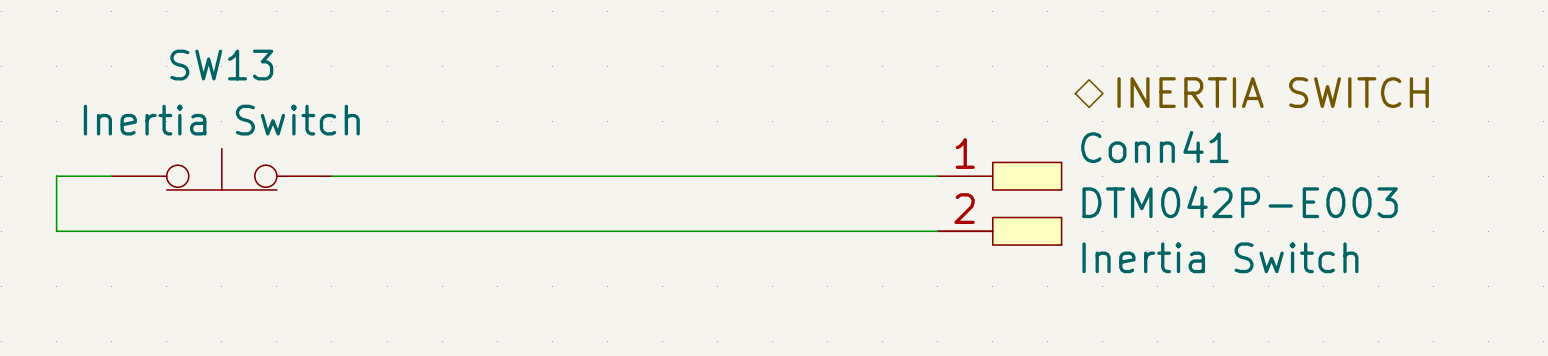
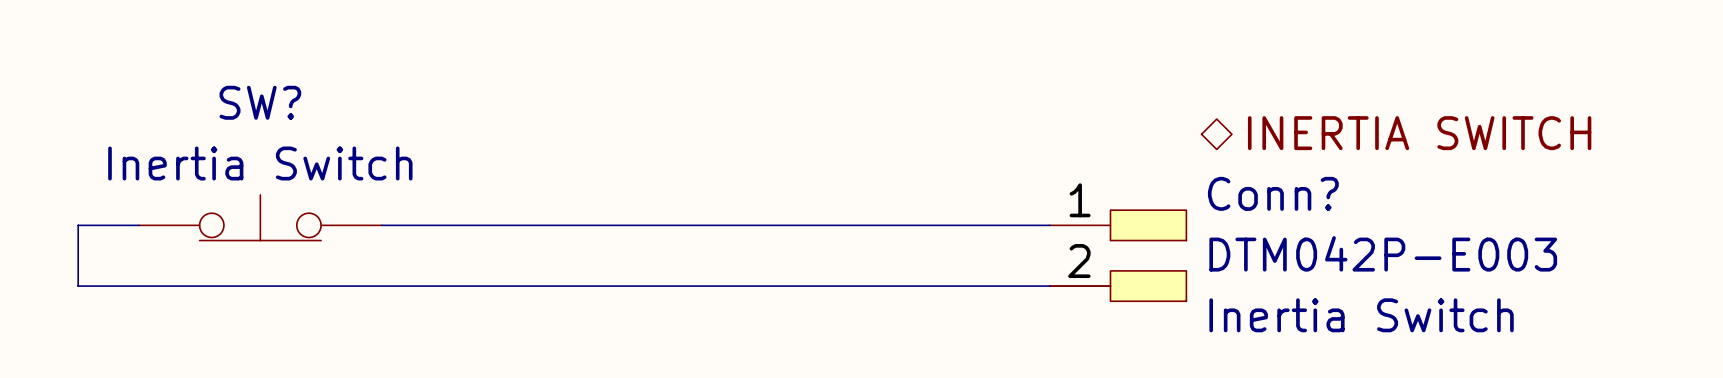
SW13 name: SW13 (221, 65) -> SW? (260, 102)
Conn41 name: Conn41 (1154, 146) -> Conn? (1273, 193)

